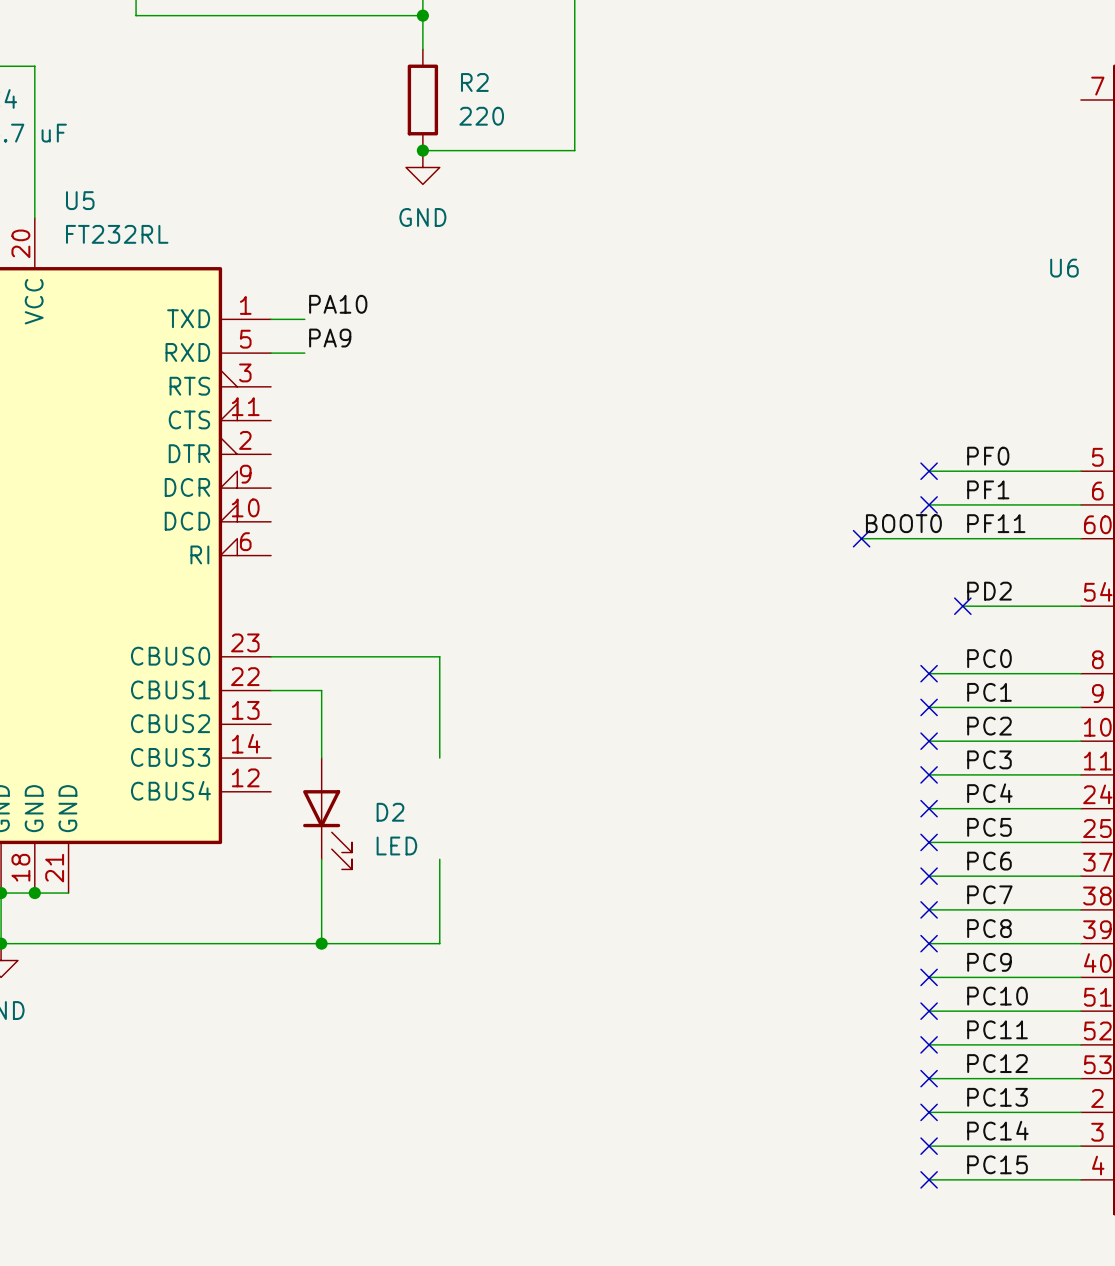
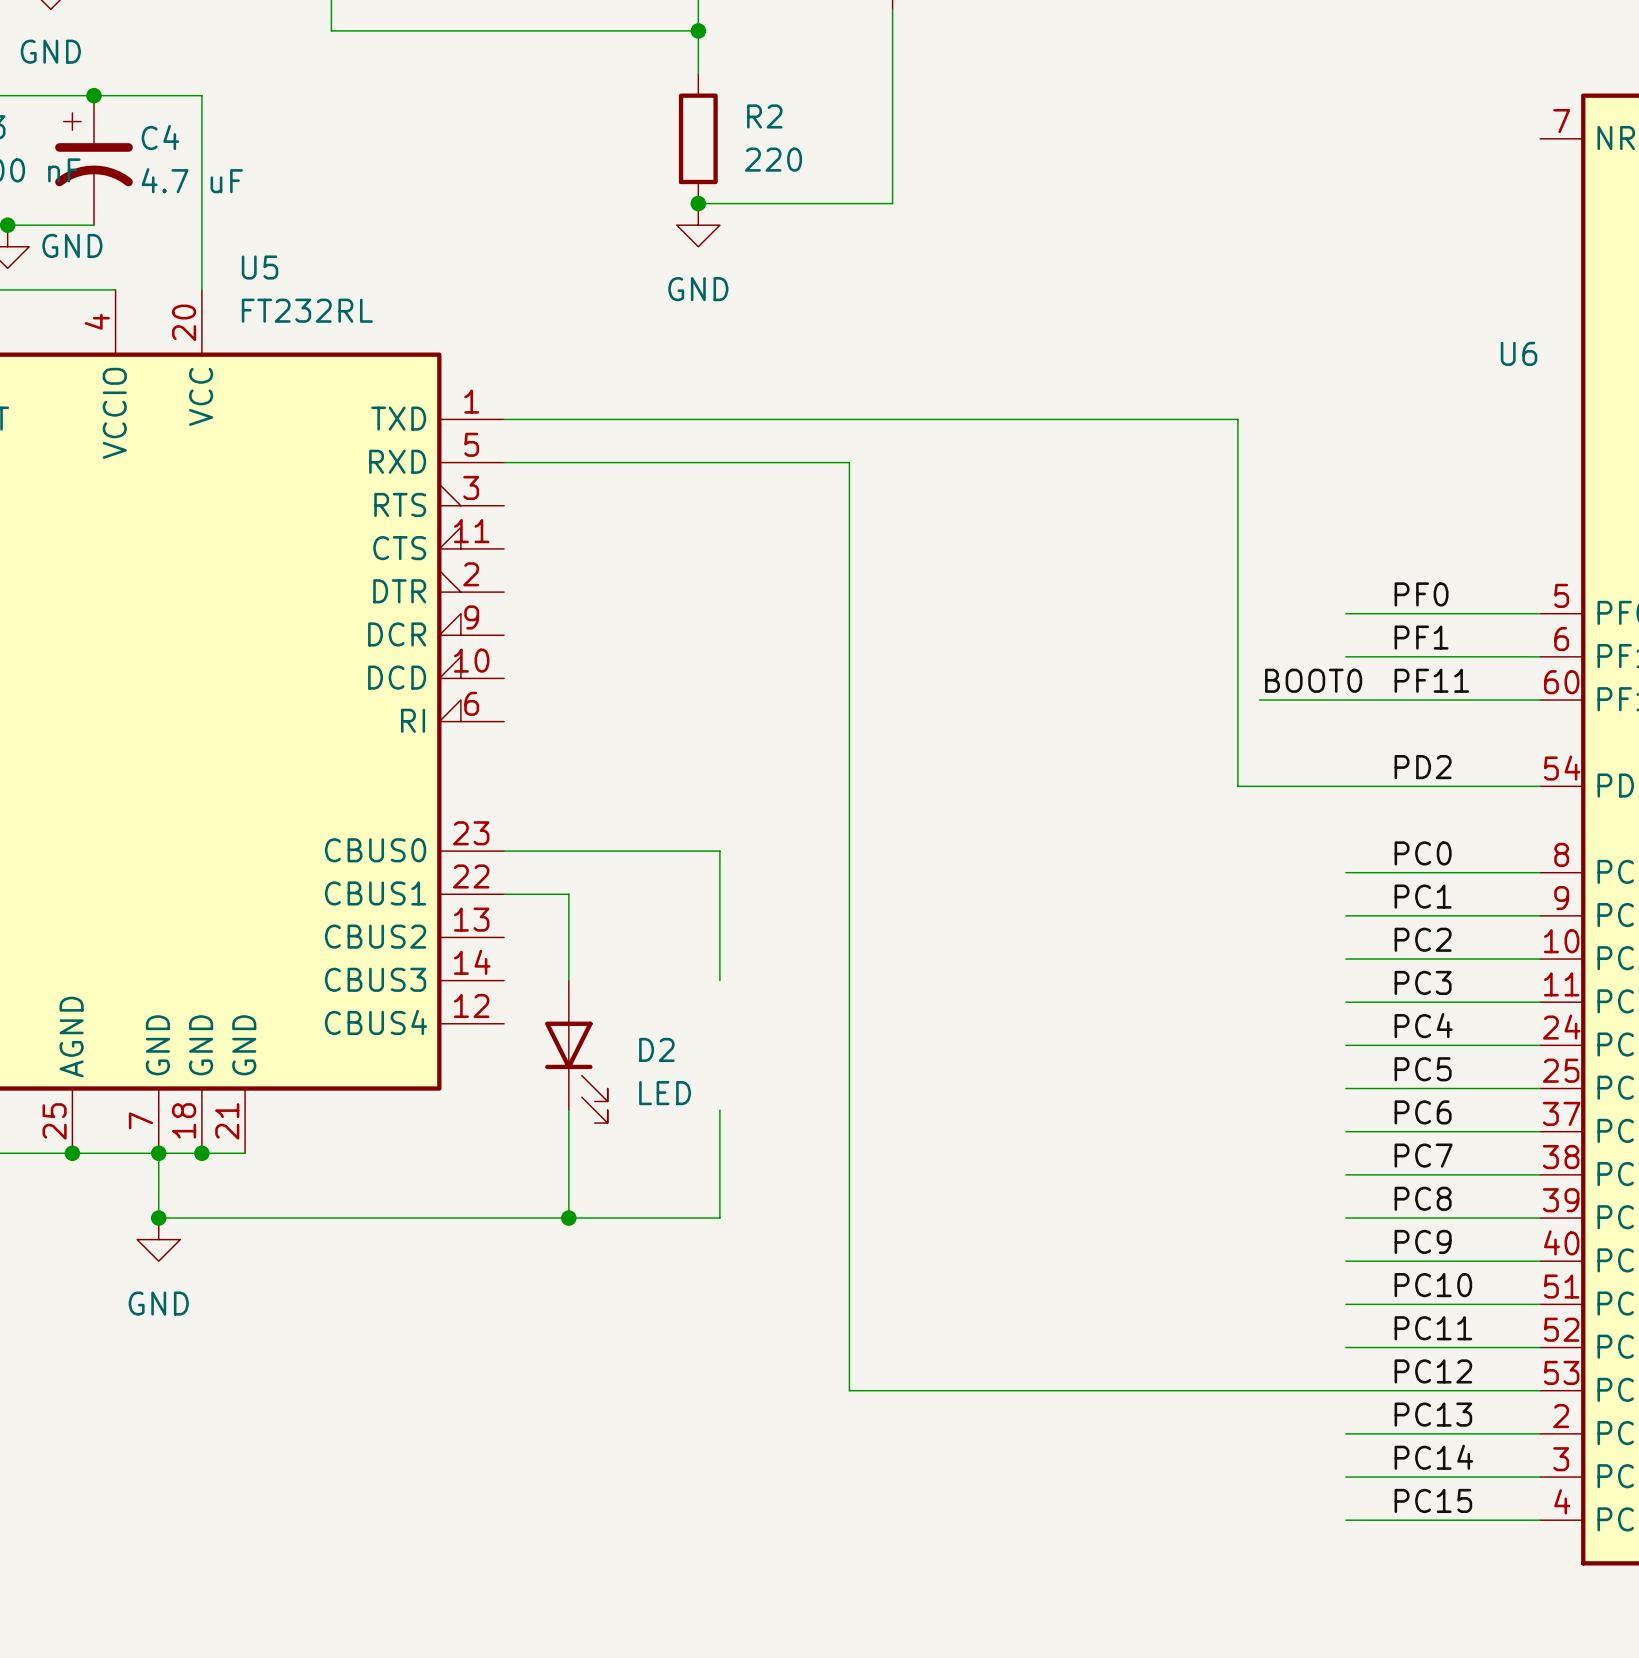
label: PA10 (338, 304) -> none
wire: none -> (547, 419) (1237, 419) (1237, 786) (1389, 786)
label: PA9 (330, 338) -> none
wire: none -> (547, 462) (849, 462) (849, 1390) (1345, 1390)
no-connect mark: (929, 471) -> none
no-connect mark: (929, 504) -> none
no-connect mark: (861, 538) -> none
no-connect mark: (962, 606) -> none
no-connect mark: (929, 673) -> none
no-connect mark: (929, 707) -> none
no-connect mark: (929, 741) -> none
no-connect mark: (929, 774) -> none
no-connect mark: (929, 808) -> none
no-connect mark: (929, 842) -> none
no-connect mark: (929, 876) -> none
no-connect mark: (929, 909) -> none
no-connect mark: (929, 943) -> none
no-connect mark: (929, 977) -> none
no-connect mark: (929, 1011) -> none
no-connect mark: (929, 1044) -> none
no-connect mark: (929, 1078) -> none
no-connect mark: (929, 1112) -> none
no-connect mark: (929, 1146) -> none
no-connect mark: (929, 1179) -> none

